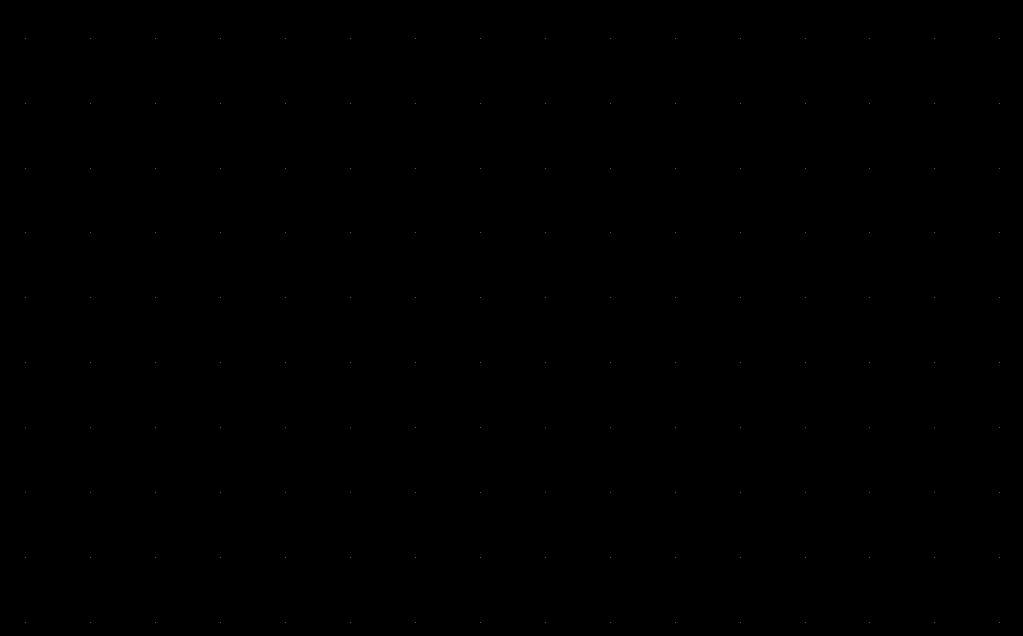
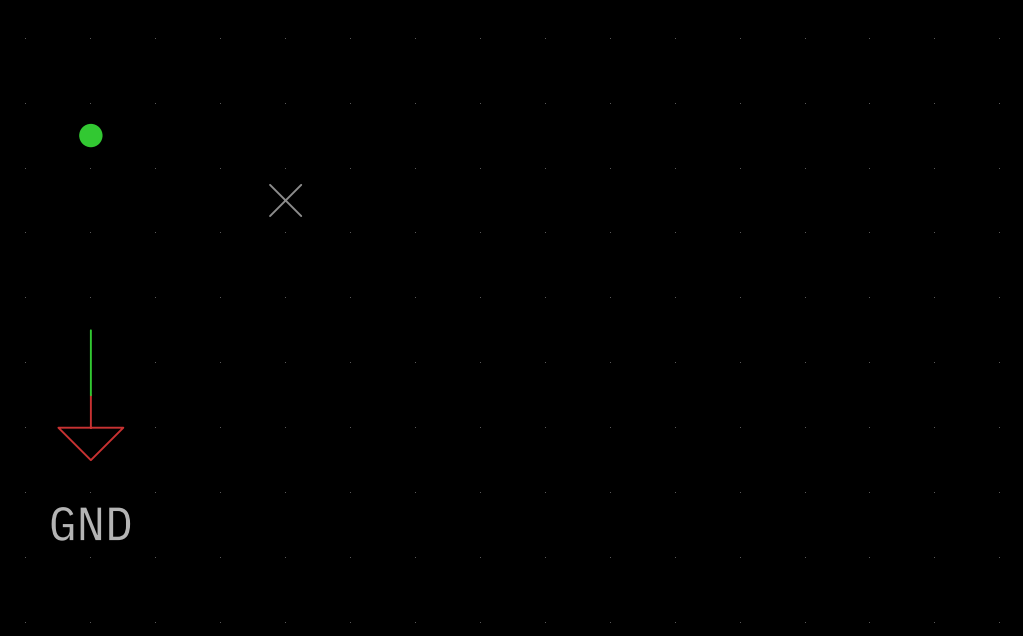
junction: none -> (90, 135)
no-connect mark: none -> (285, 200)
wire: none -> (90, 330) (90, 395)
power symbol: none -> GND (90, 427)

